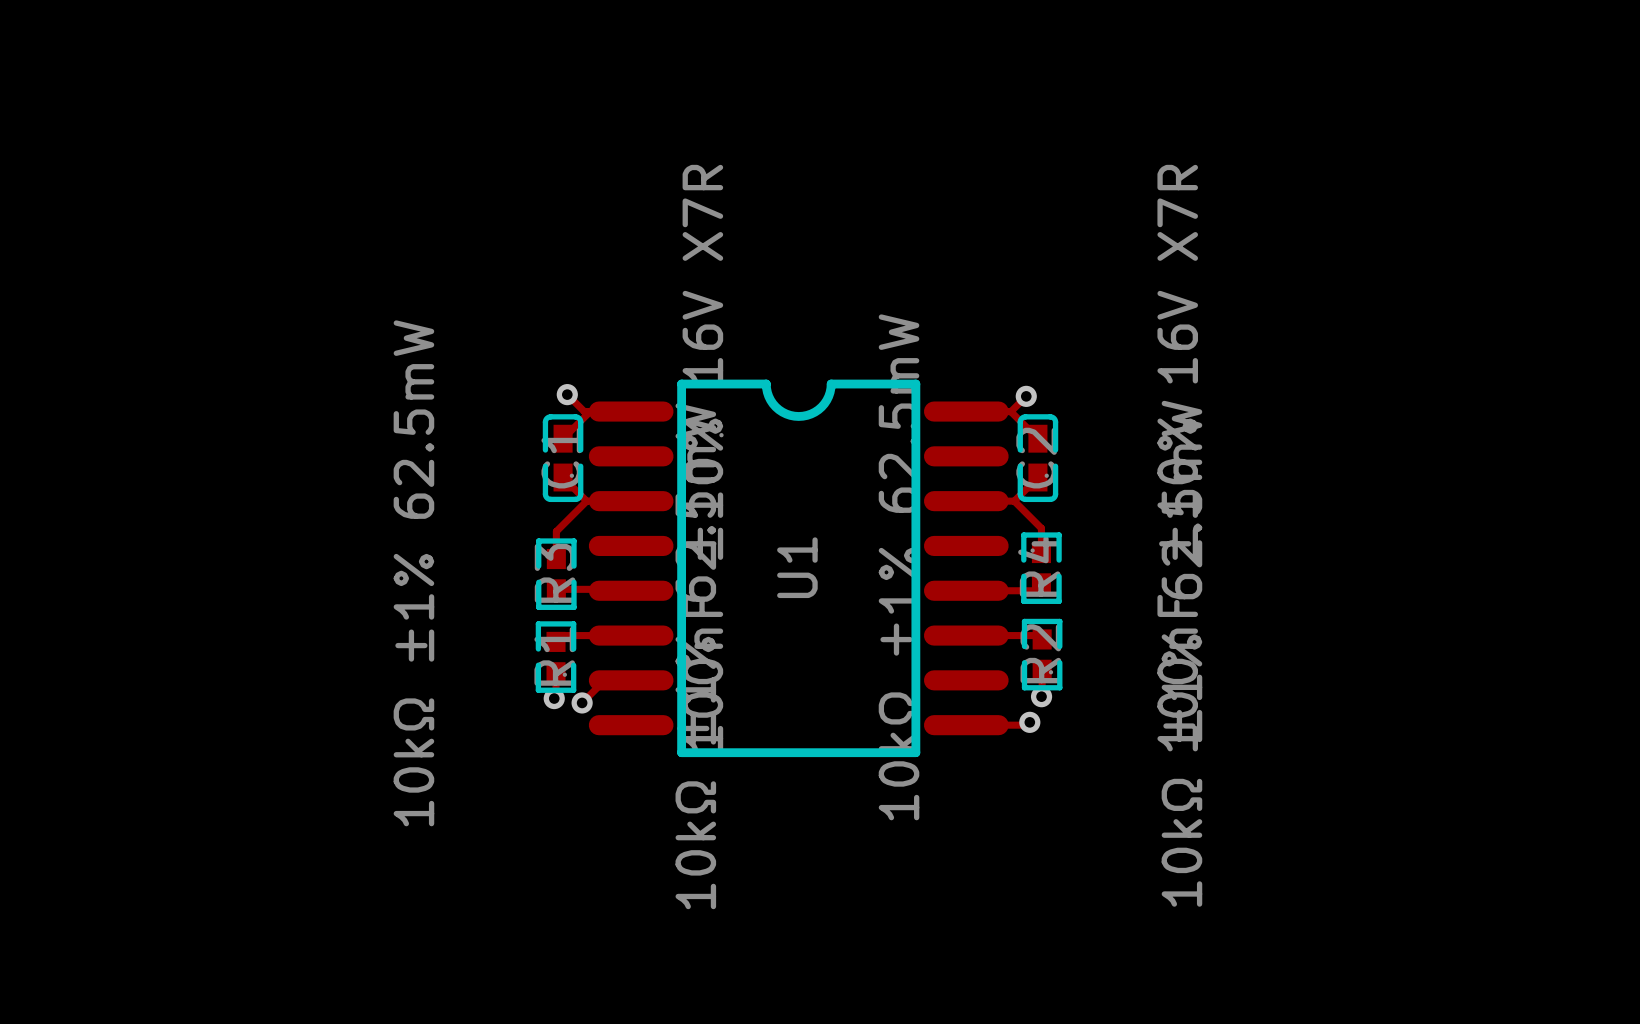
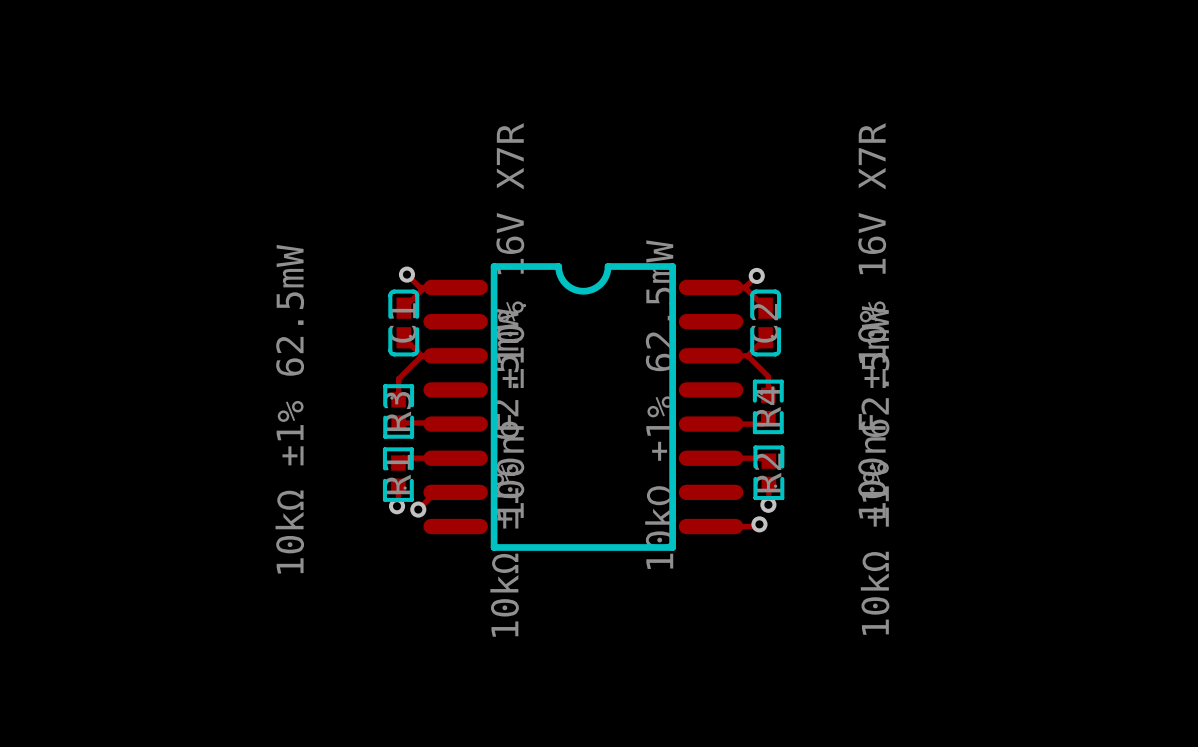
U1 name: U1 (797, 567) -> none

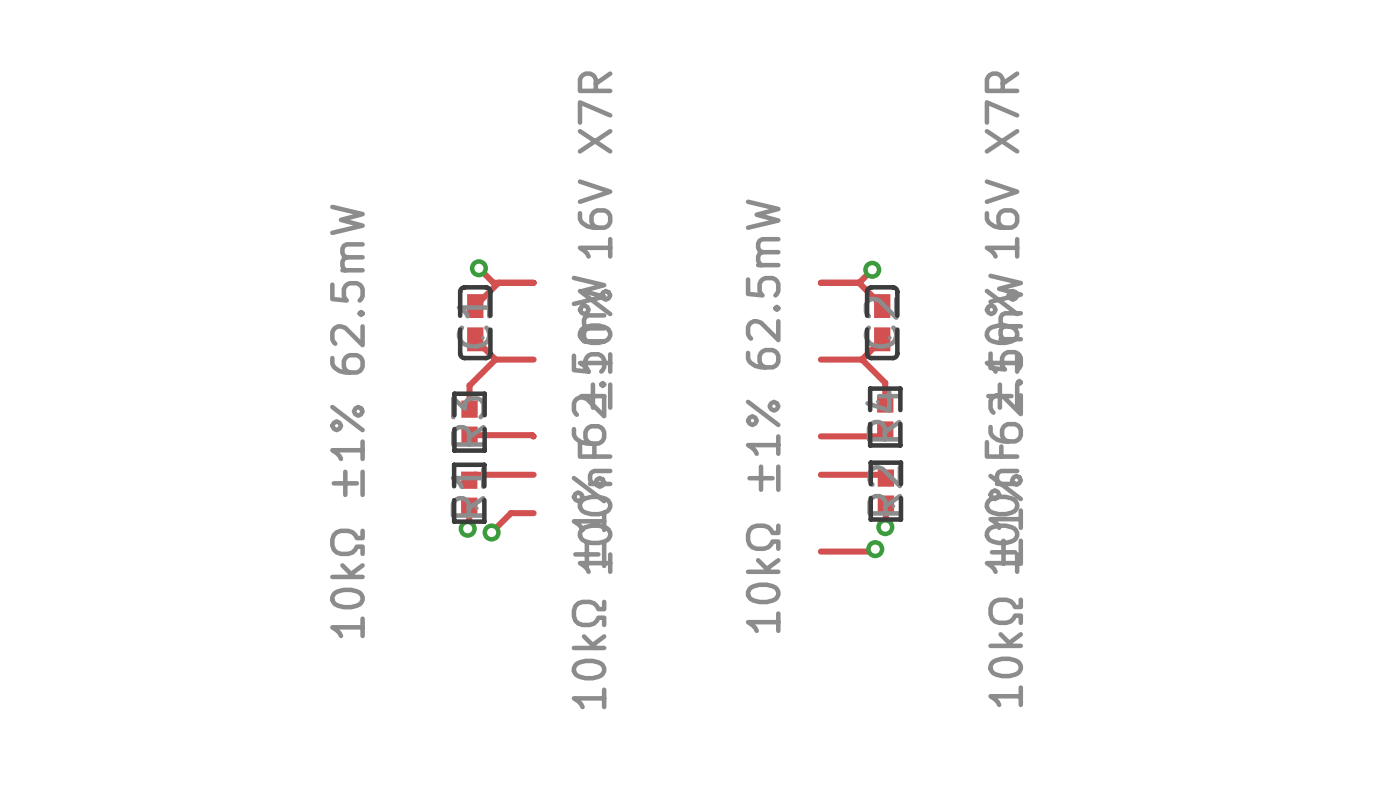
part: (583, 407) -> none

